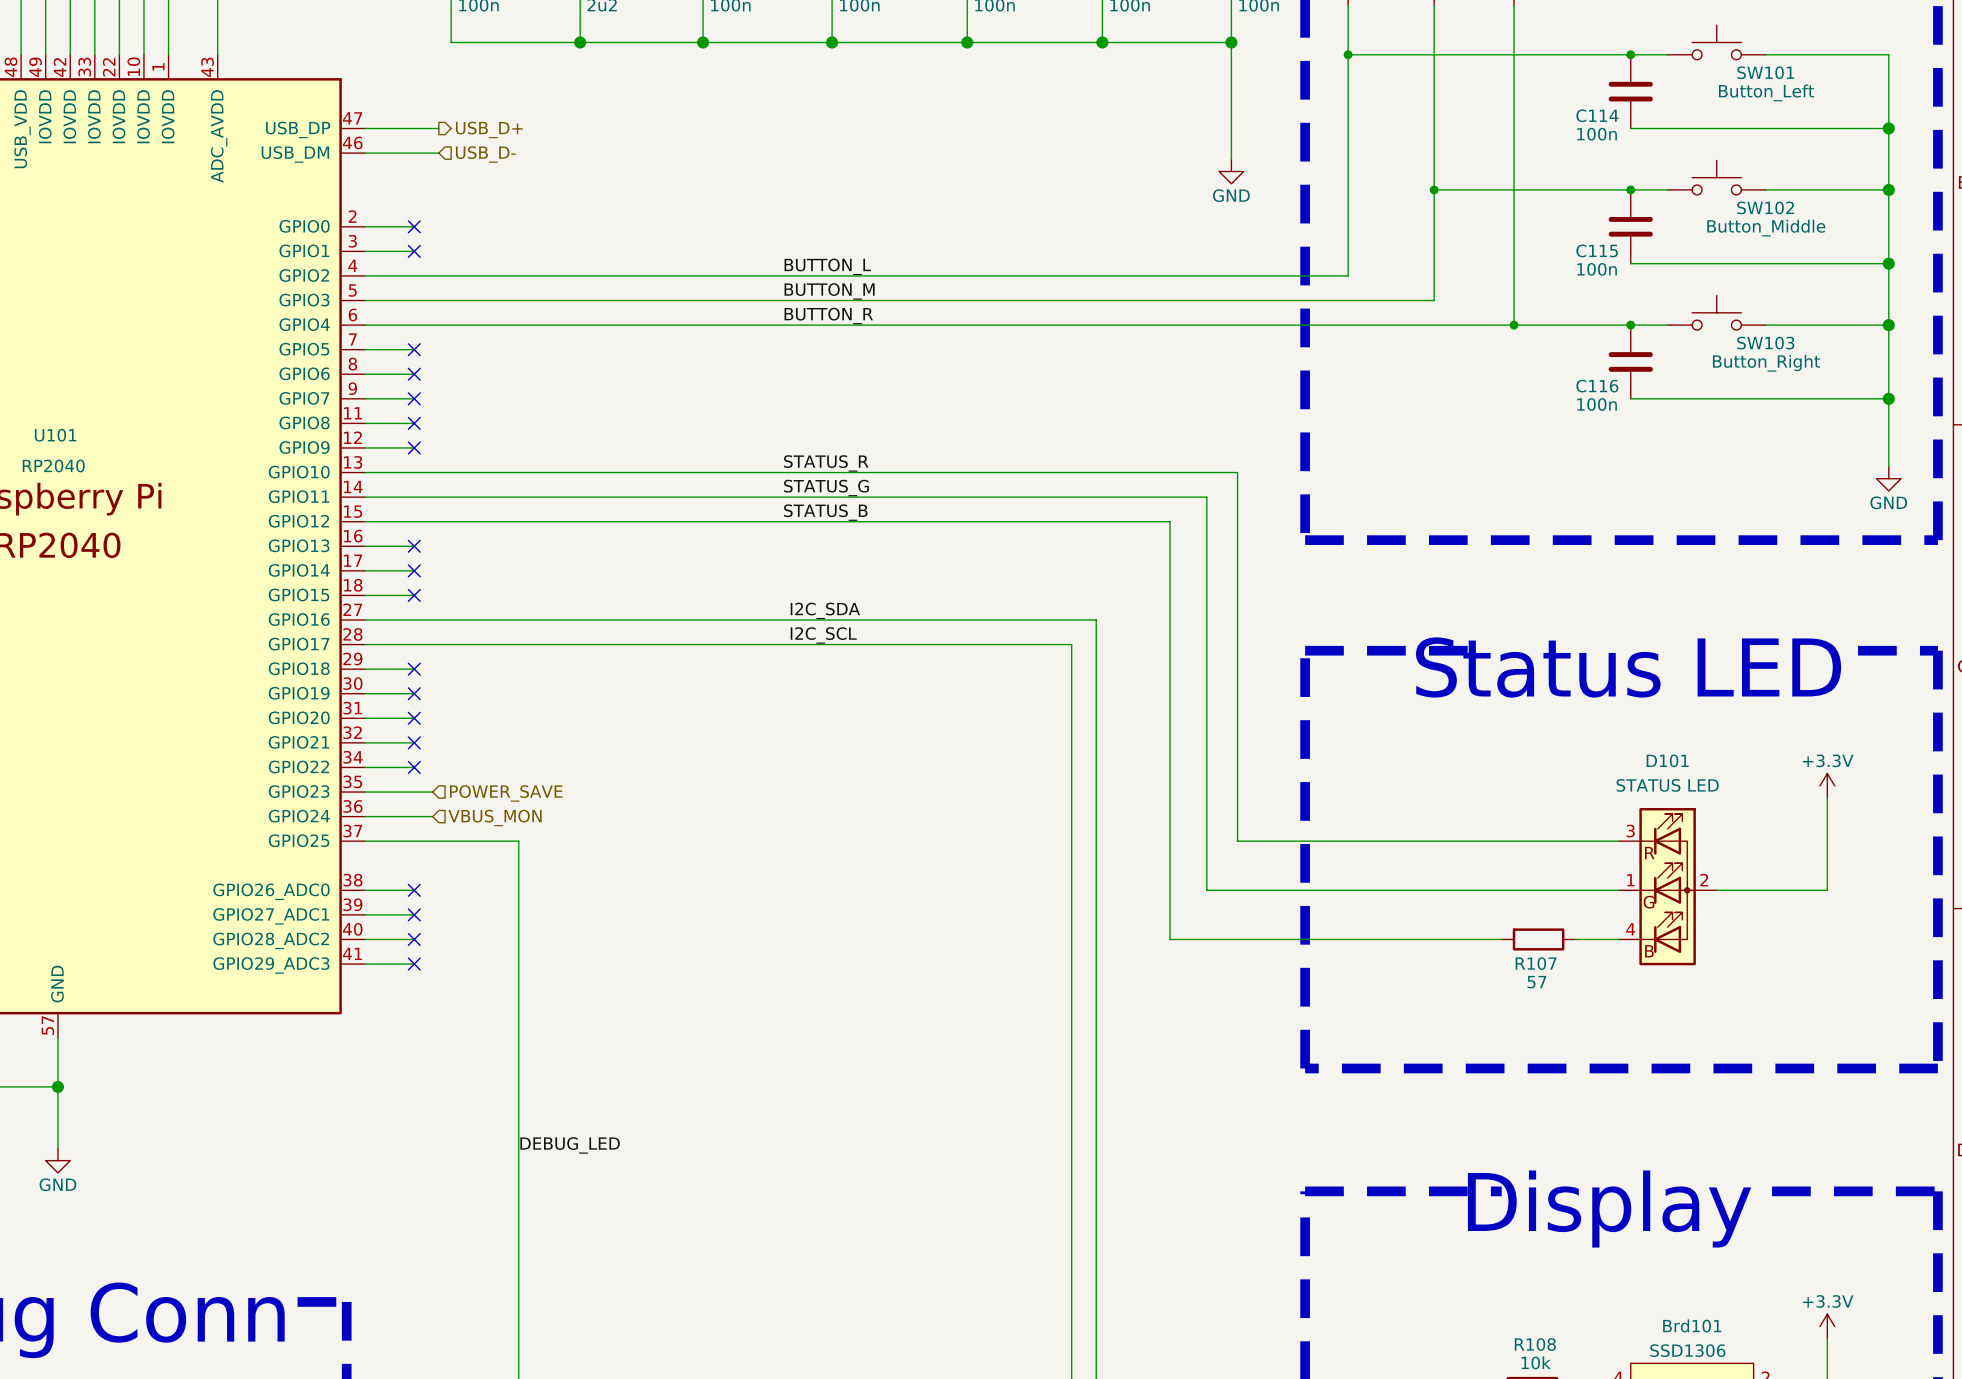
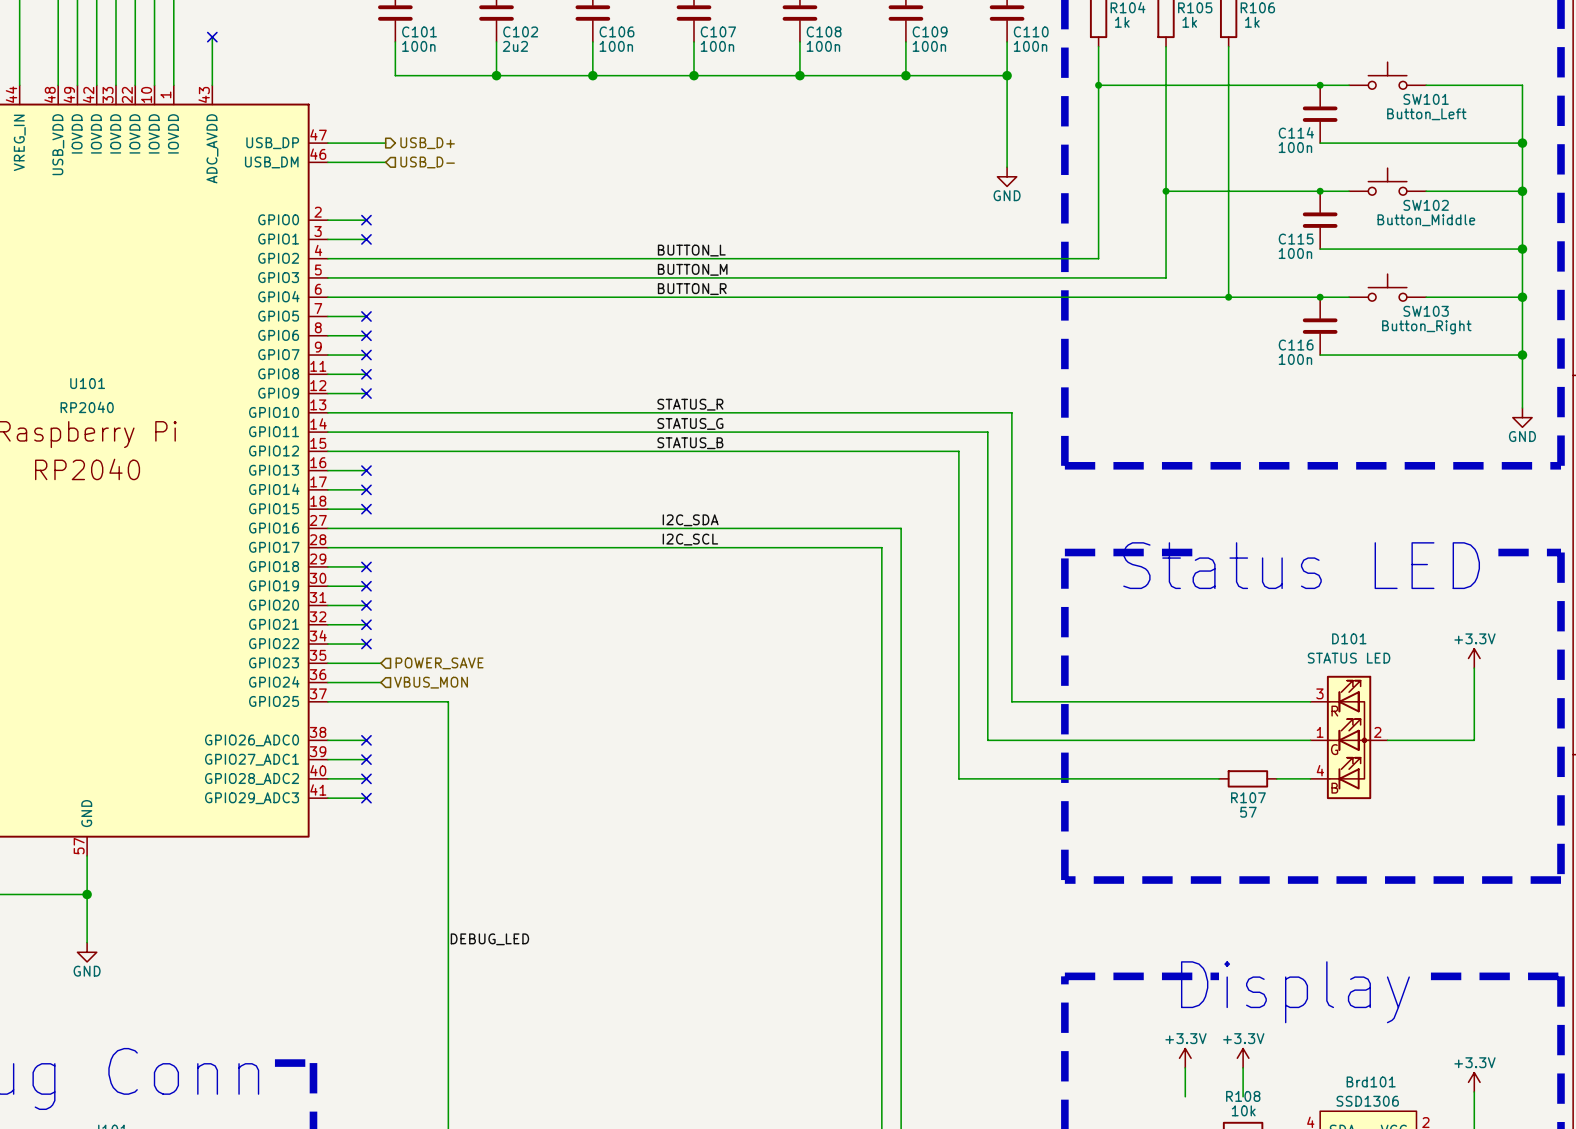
power symbol: none -> +3.3V (1185, 1058)
power symbol: none -> +3.3V (1243, 1058)
wire: none -> (1185, 1067) (1185, 1096)
wire: none -> (1243, 1067) (1243, 1096)

